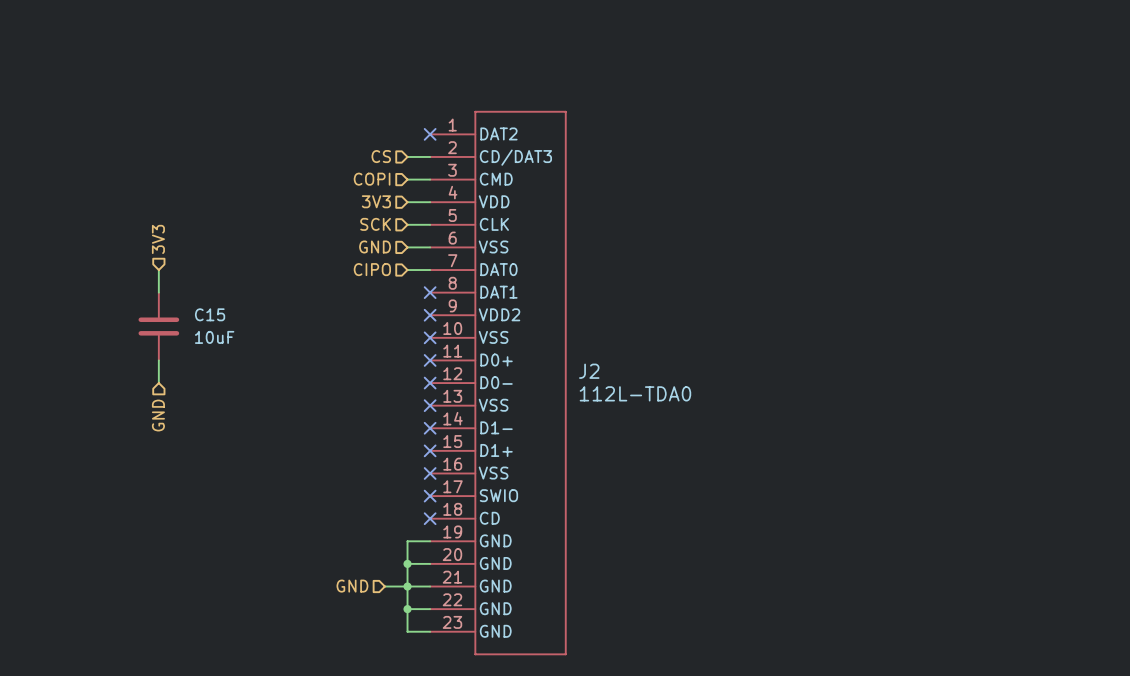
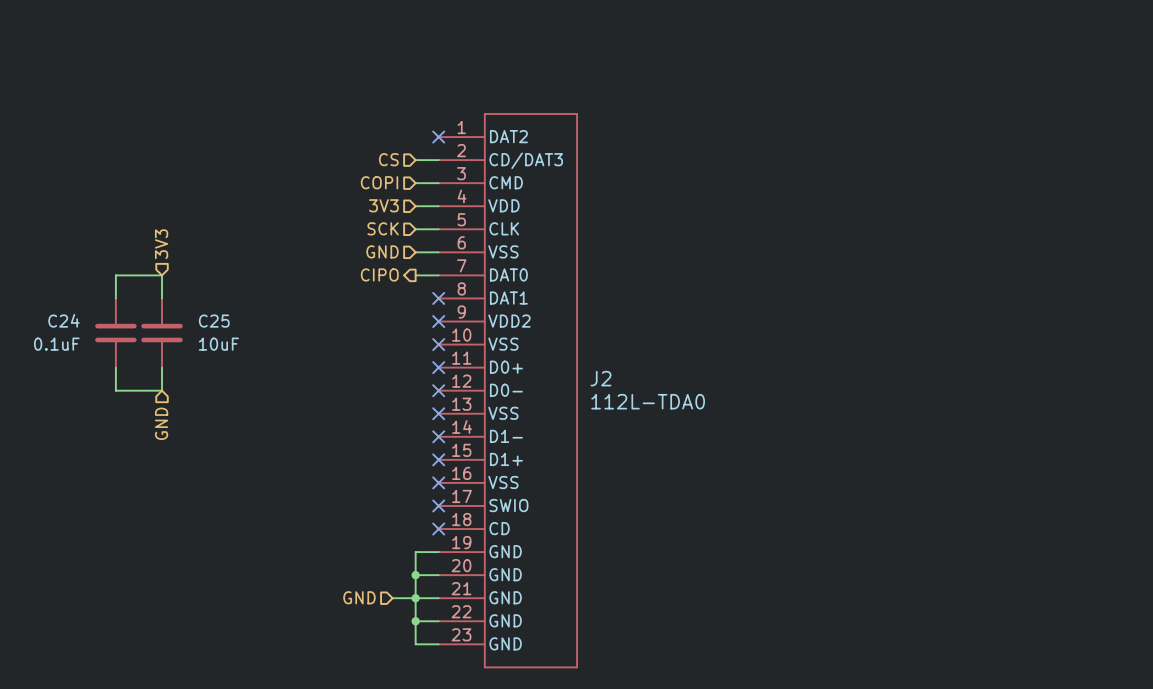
hierarchical label shape: input (372, 269) -> output (379, 274)
wire: none -> (162, 275) (115, 275) (115, 298)
C15 name: C15 (210, 314) -> C25 (214, 321)
C24: none -> 0.1uF (115, 333)
wire: none -> (115, 367) (115, 390) (162, 390)

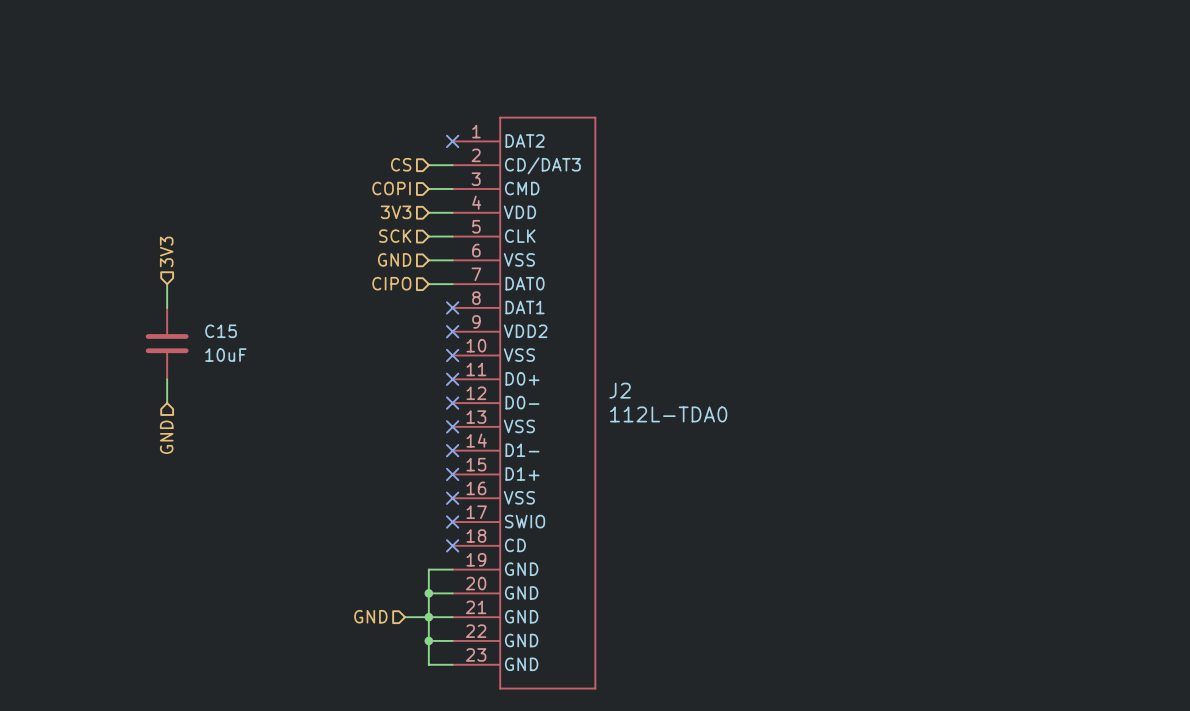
hierarchical label shape: output (379, 274) -> input (391, 283)
wire: (162, 275) (115, 275) (115, 298) -> none
C25 name: C25 (214, 321) -> C15 (221, 331)
C24: 0.1uF (115, 333) -> none
wire: (115, 367) (115, 390) (162, 390) -> none

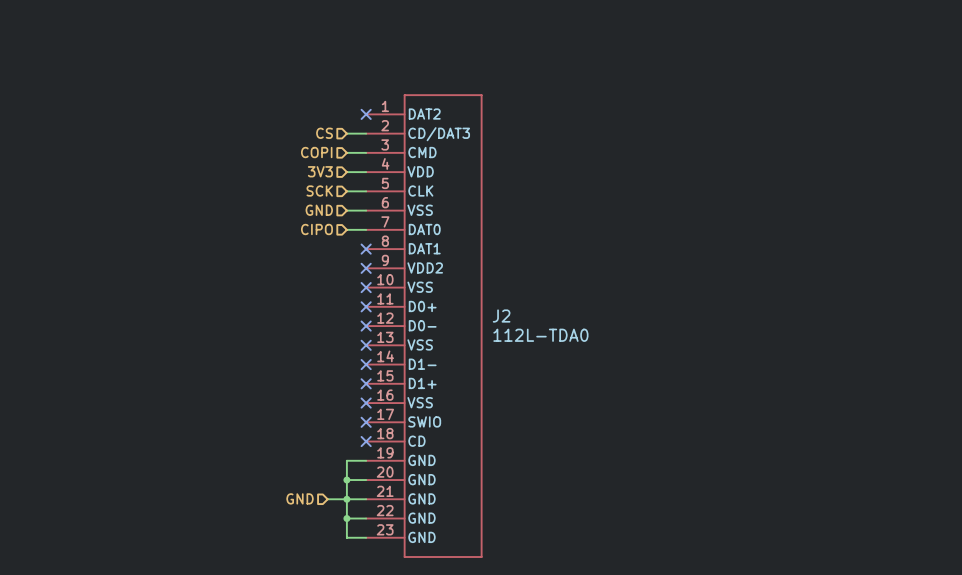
hierarchical label: 3V3 (166, 251) -> none
wire: (167, 284) (167, 307) -> none
C15: 10uF (167, 343) -> none
wire: (167, 379) (167, 403) -> none
hierarchical label: GND (166, 437) -> none

